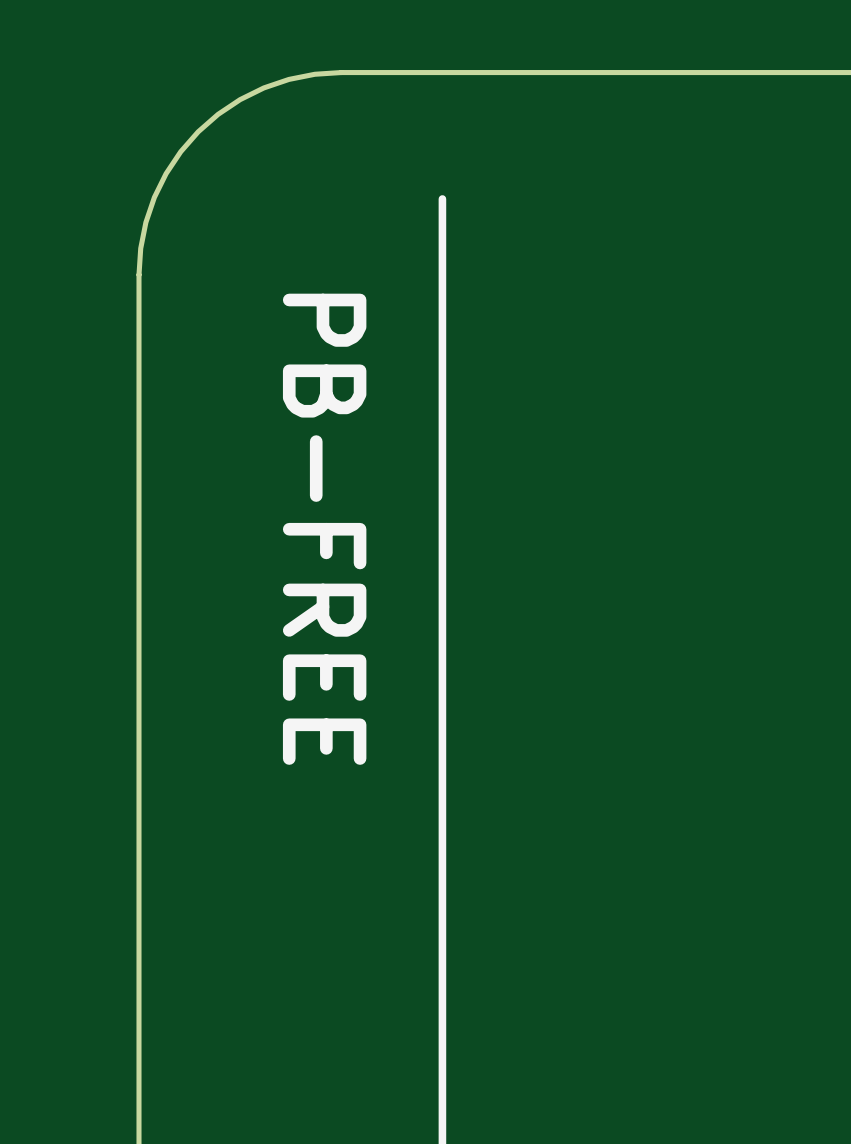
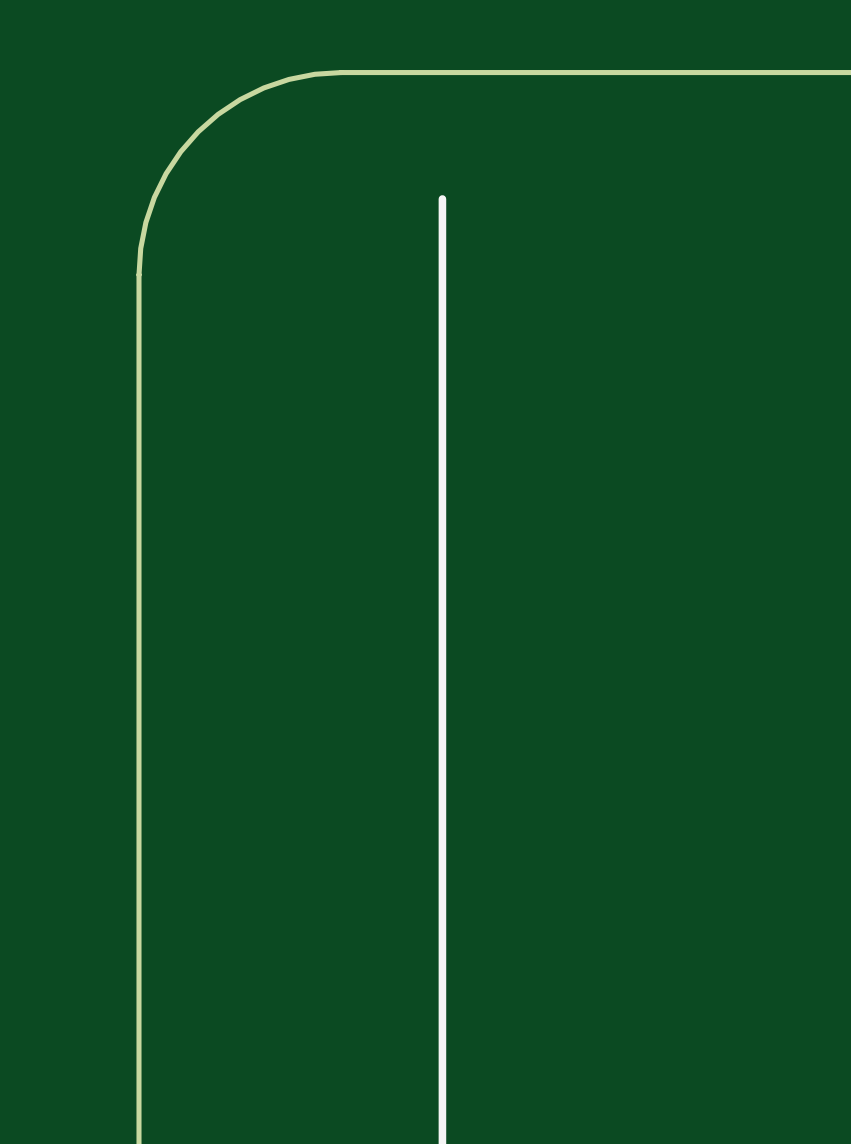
text: PB-FREE (324, 529) -> none

